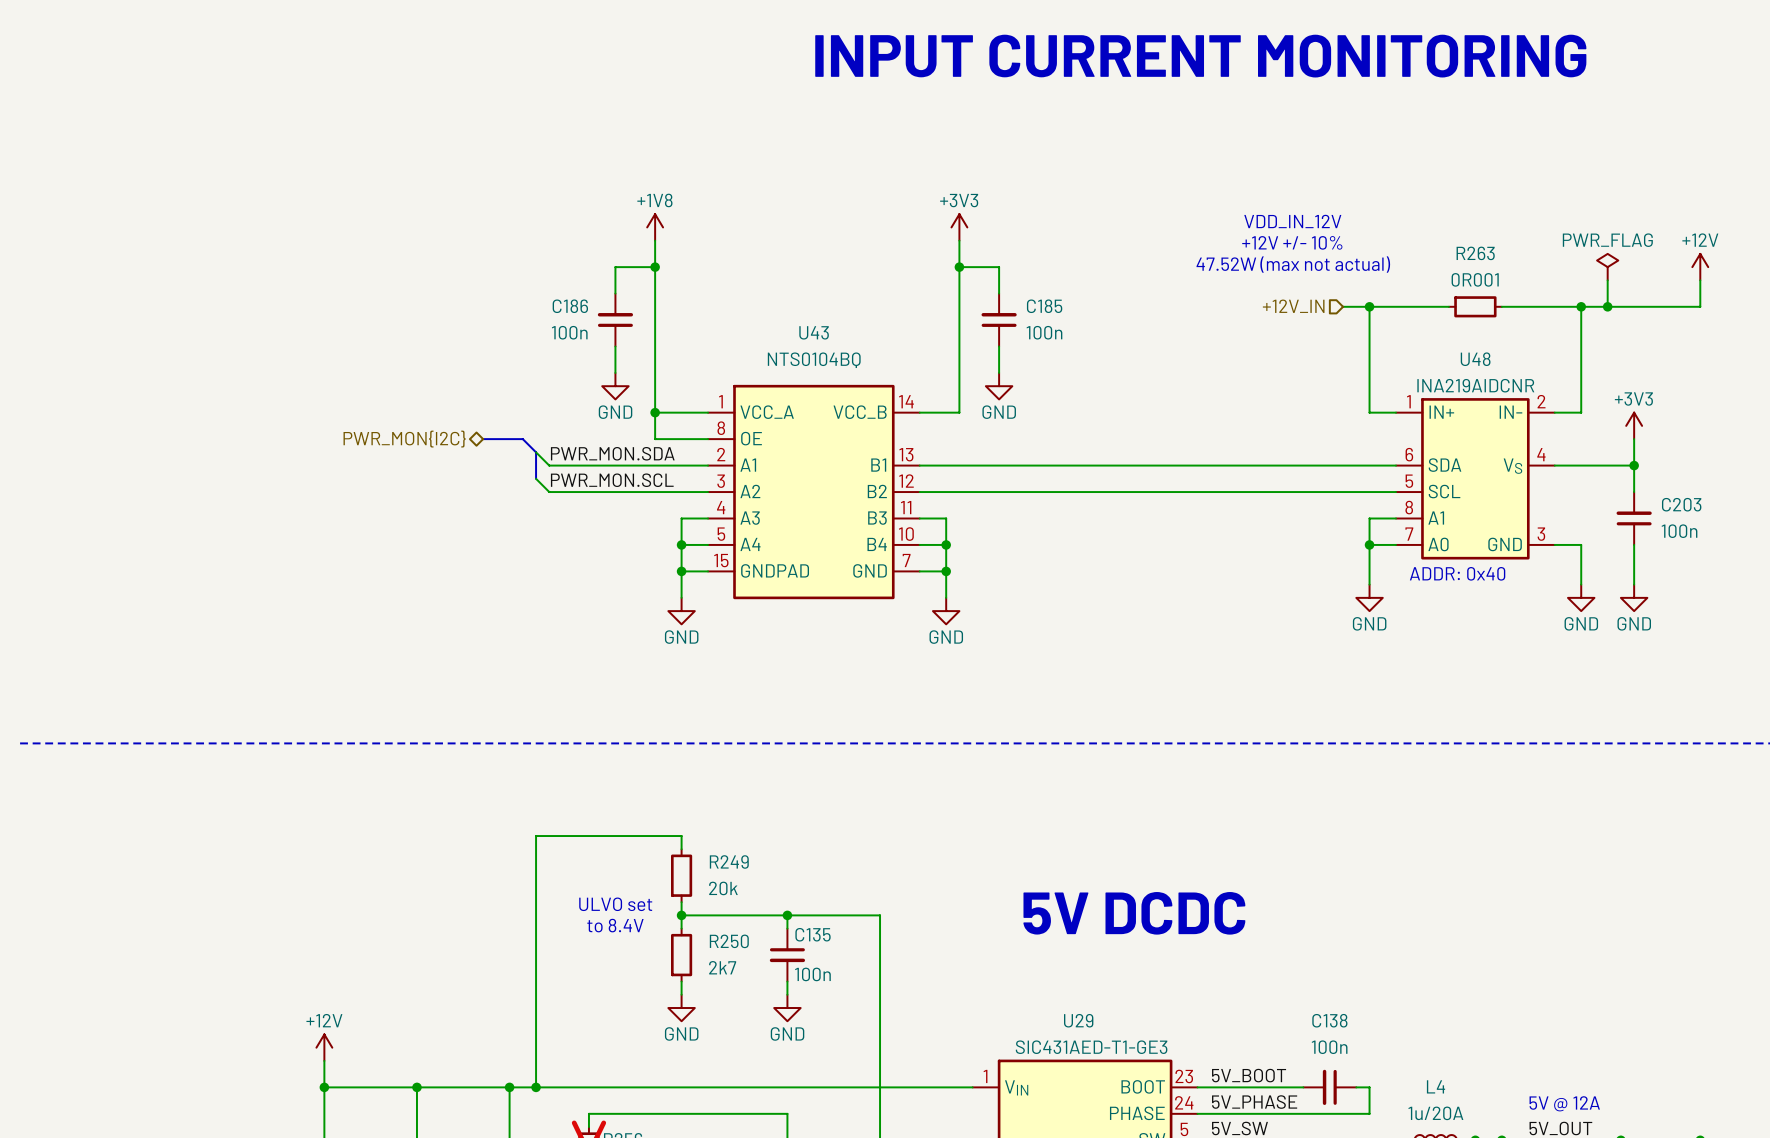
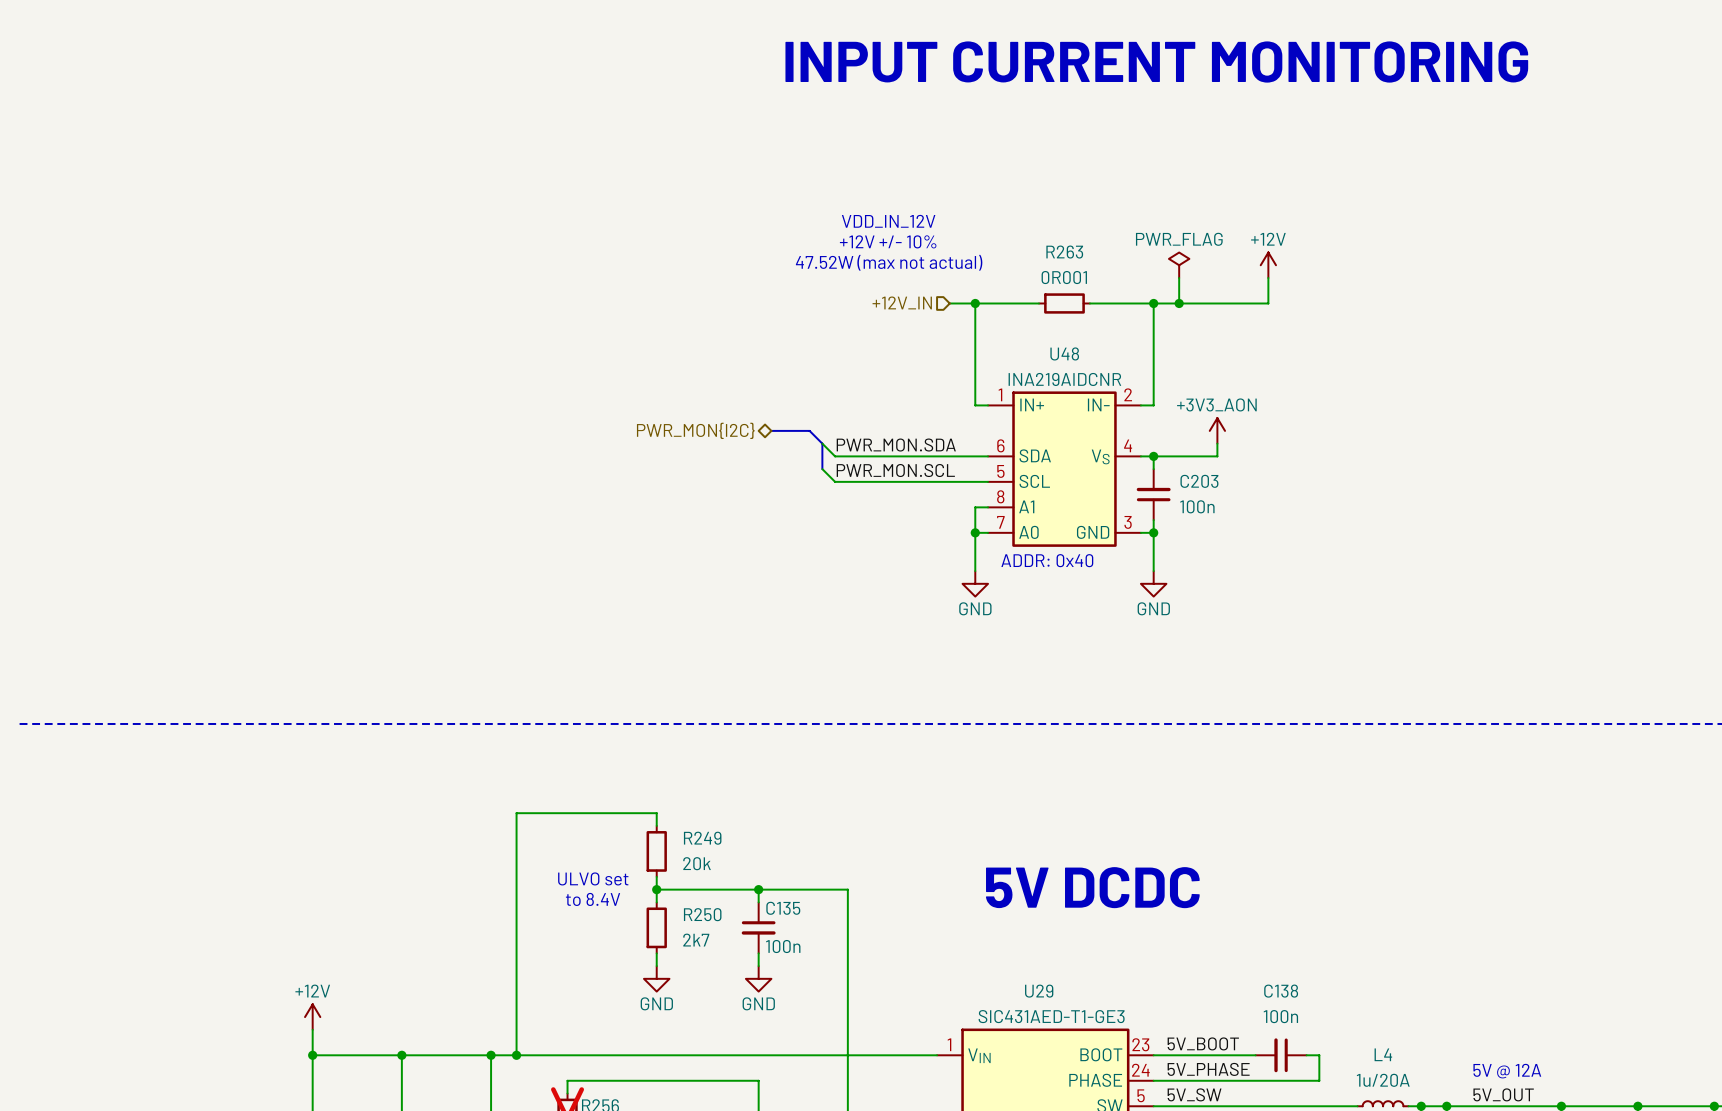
text: none -> VDD_IN_12V (888, 221)
text: VDD_IN_12V (1292, 221) -> none
power symbol: +1V8 (655, 227) -> none
power symbol: +3V3 (959, 227) -> none
wire: (655, 240) (655, 439) (708, 439) -> none
wire: (959, 240) (959, 412) (919, 412) -> none
text: none -> +12V +/- 10% (888, 241)
text: +12V +/- 10% (1292, 242) -> none
text: none -> 47.52W (max not actual) (889, 262)
text: 47.52W (max not actual) (1293, 264) -> none
wire: (655, 267) (615, 267) (615, 293) -> none
junction: (655, 267) -> none
wire: (959, 267) (999, 267) (999, 293) -> none
junction: (959, 267) -> none
power symbol: none -> PWR_FLAG (1179, 265)
power symbol: none -> +12V (1268, 265)
power symbol: PWR_FLAG (1607, 267) -> none
power symbol: +12V (1700, 267) -> none
wire: none -> (1268, 278) (1268, 303) (1089, 303)
wire: (1607, 280) (1607, 306) -> none
wire: (1700, 280) (1700, 306) (1501, 306) -> none
hierarchical label: none -> +12V_IN (902, 302)
wire: none -> (949, 303) (1039, 303)
wire: none -> (975, 303) (975, 405) (988, 405)
junction: none -> (975, 303)
wire: none -> (1153, 303) (1153, 405) (1140, 405)
junction: none -> (1153, 303)
junction: none -> (1179, 303)
hierarchical label: +12V_IN (1293, 306) -> none
wire: (1343, 306) (1448, 306) -> none
wire: (1369, 306) (1369, 412) (1396, 412) -> none
junction: (1369, 306) -> none
R263 position: (1475, 306) -> (1064, 303)
wire: (1581, 306) (1581, 412) (1554, 412) -> none
junction: (1581, 306) -> none
junction: (1607, 306) -> none
C186: (615, 320) -> none
C185: (999, 320) -> none
wire: (615, 346) (615, 372) -> none
wire: (999, 346) (999, 372) -> (1179, 278) (1179, 303)
power symbol: GND (615, 386) -> none
power symbol: GND (999, 386) -> none
wire: (655, 412) (708, 412) -> none
junction: (655, 412) -> none
power symbol: +3V3 (1634, 425) -> none
hierarchical label: PWR_MON{I2C} (404, 439) -> none
bus: (483, 439) (522, 439) (536, 452) (536, 478) -> none
hierarchical label: none -> PWR_MON{I2C} (695, 430)
bus: none -> (771, 430) (809, 430) (822, 443) (822, 469)
power symbol: none -> +3V3_AON (1217, 430)
wire: (1634, 439) (1634, 492) -> none
wire: (536, 452) (549, 465) (708, 465) -> none
label: PWR_MON.SDA (612, 453) -> none
label: none -> PWR_MON.SDA (896, 445)
wire: none -> (1153, 456) (1153, 469)
junction: none -> (1153, 456)
wire: (1263, 465) (1396, 465) -> (1217, 456) (1217, 443)
wire: (1554, 465) (1634, 465) -> none
junction: (1634, 465) -> none
wire: (536, 478) (549, 492) (708, 492) -> none
U48 position: (1475, 478) -> (1064, 469)
label: PWR_MON.SCL (612, 480) -> none
label: none -> PWR_MON.SCL (895, 470)
U43: (813, 492) -> none
wire: (1025, 492) (1396, 492) -> none
wire: (708, 518) (681, 518) (681, 597) -> none
wire: (919, 518) (946, 518) (946, 597) -> none
wire: none -> (988, 507) (975, 507) (975, 571)
wire: (1396, 518) (1369, 518) (1369, 584) -> none
C203 position: (1634, 518) -> (1153, 494)
wire: none -> (1153, 520) (1153, 571)
wire: (681, 544) (708, 544) -> none
junction: (681, 544) -> none
wire: (919, 544) (946, 544) -> none
junction: (946, 544) -> none
wire: none -> (975, 532) (988, 532)
junction: none -> (975, 532)
wire: none -> (1140, 532) (1153, 532)
junction: none -> (1153, 532)
wire: (1369, 544) (1396, 544) -> none
junction: (1369, 544) -> none
wire: (1554, 544) (1581, 544) (1581, 584) -> none
wire: (1634, 544) (1634, 584) -> none
wire: (681, 571) (708, 571) -> none
junction: (681, 571) -> none
wire: (919, 571) (946, 571) -> none
junction: (946, 571) -> none
text: none -> ADDR: 0x40 (1047, 560)
text: ADDR: 0x40 (1457, 573) -> none
power symbol: none -> GND (1153, 583)
power symbol: GND (1369, 597) -> none
power symbol: GND (1581, 597) -> none
power symbol: GND (1634, 597) -> none
power symbol: GND (681, 611) -> none
power symbol position: GND (946, 611) -> GND (975, 583)

